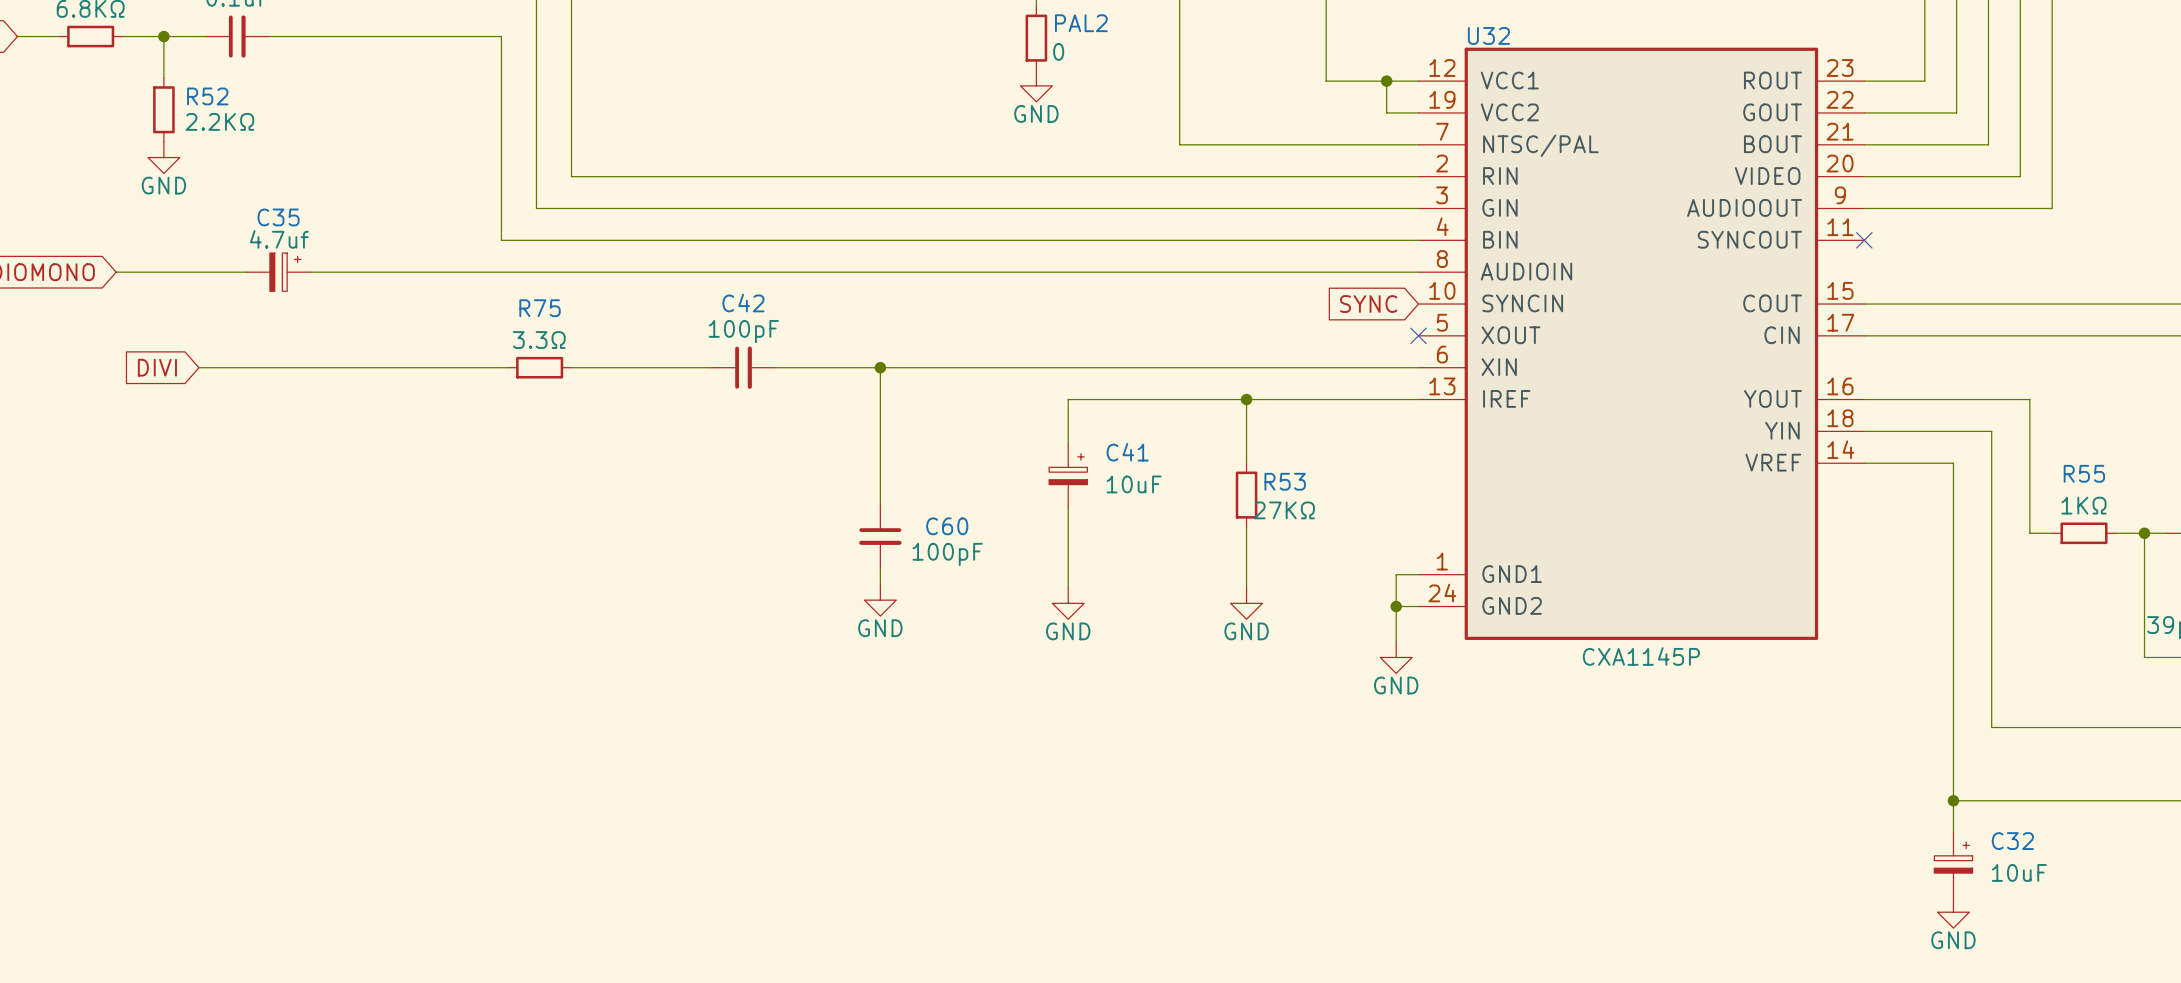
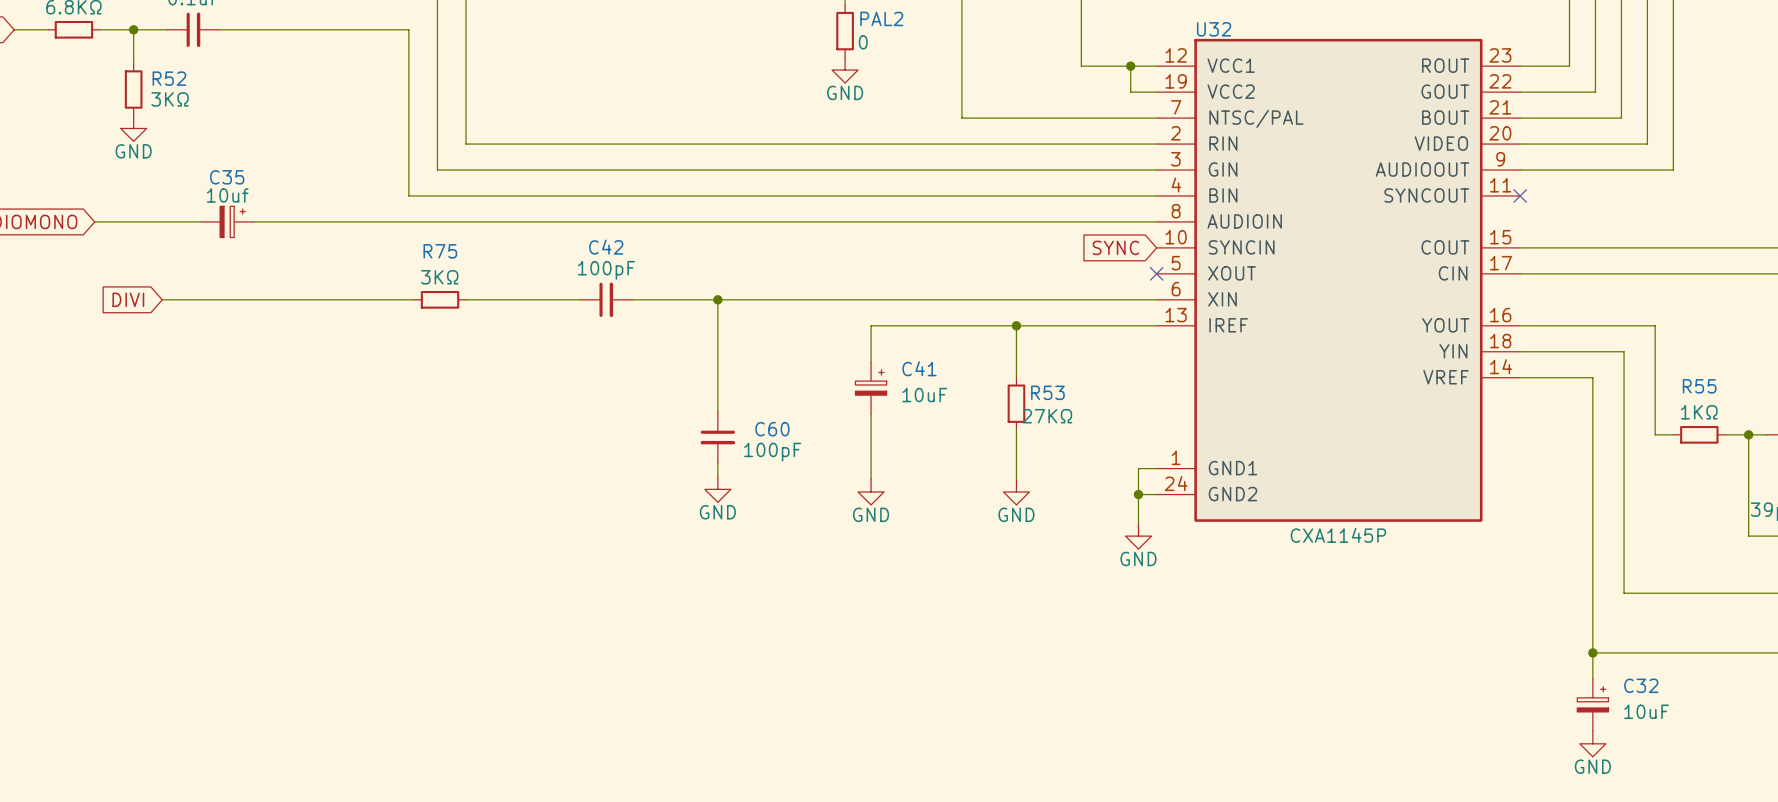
R52 value: 2.2KΩ (219, 121) -> 3KΩ (170, 99)
C35 value: 4.7uf (279, 239) -> 10uf (227, 195)
R75 value: 3.3Ω (539, 340) -> 3KΩ (439, 277)

